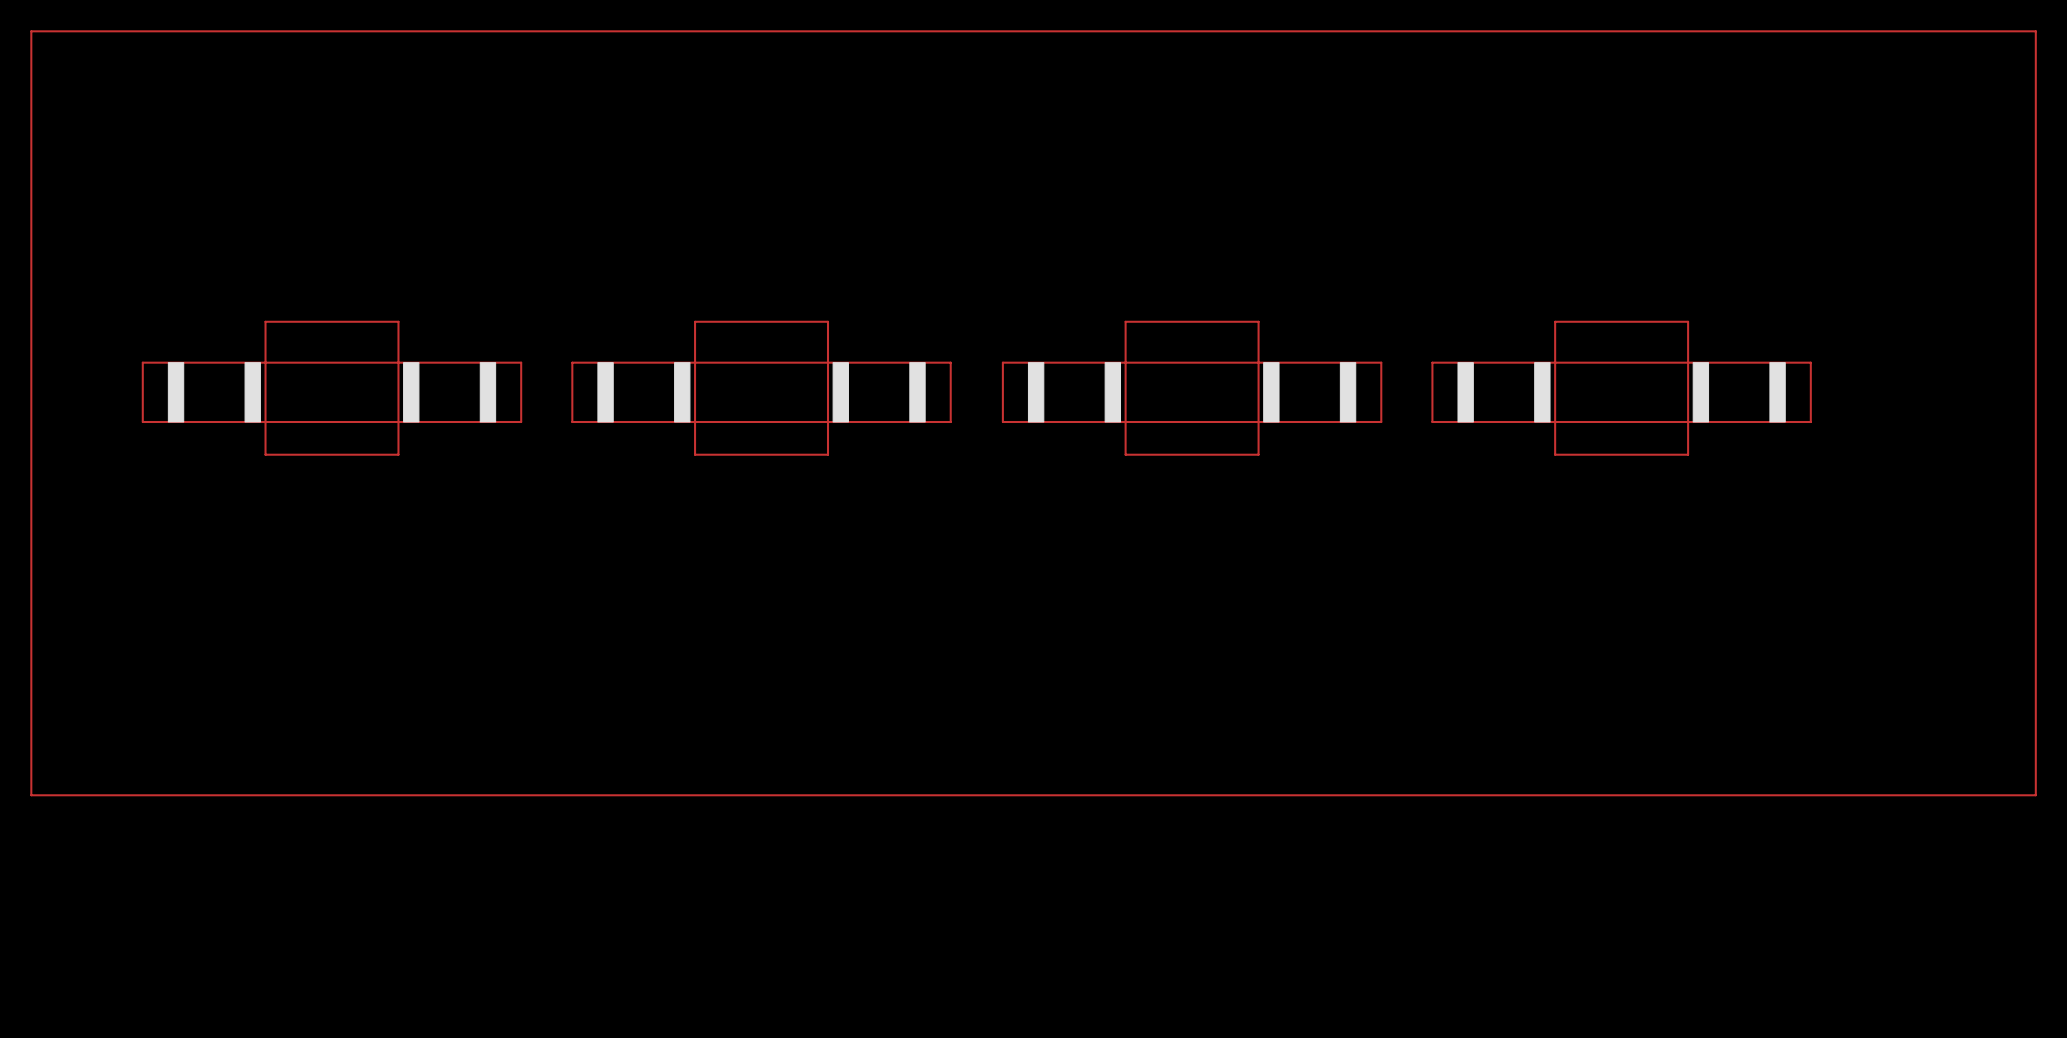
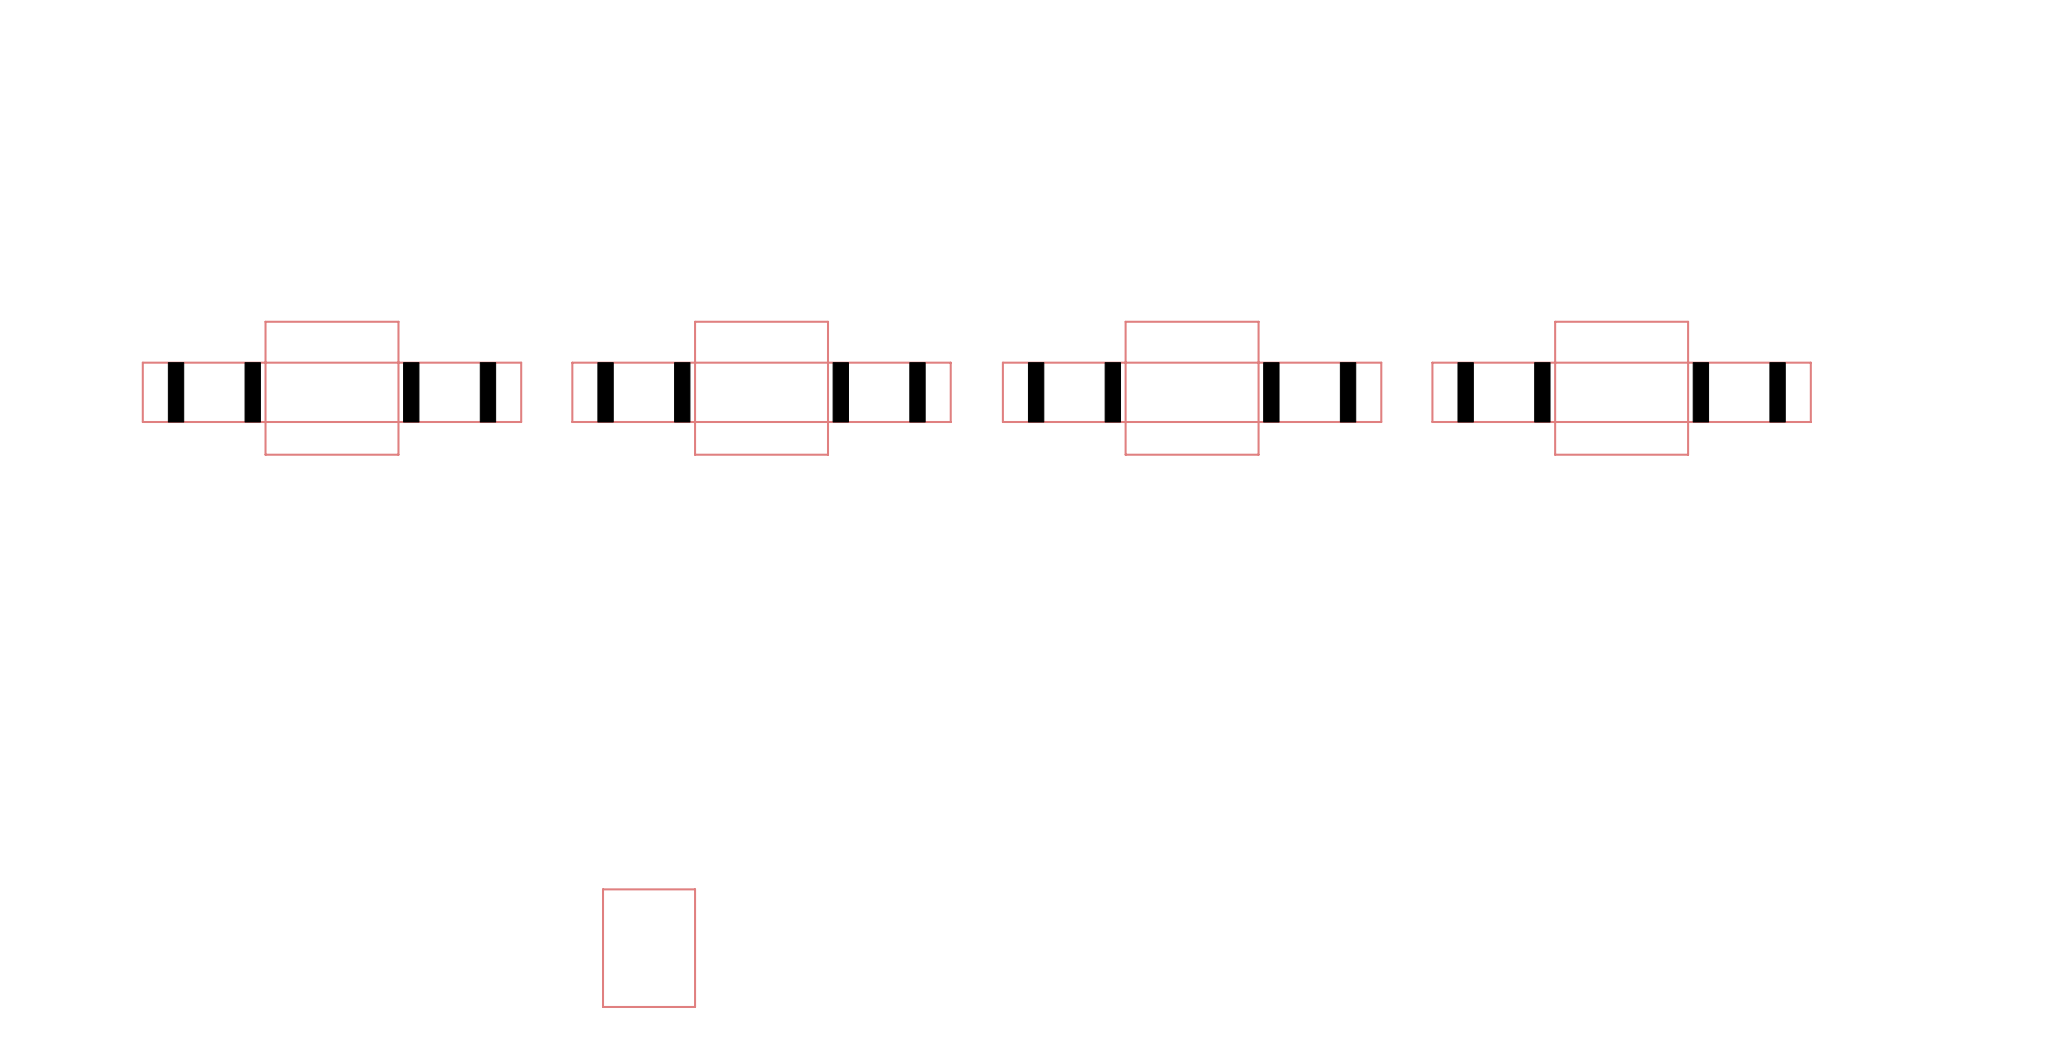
top track: (31, 31) (2035, 31) (2035, 795) (31, 795) (31, 31) -> none
top track: none -> (603, 889) (695, 889) (695, 1006) (603, 1006) (603, 889)

